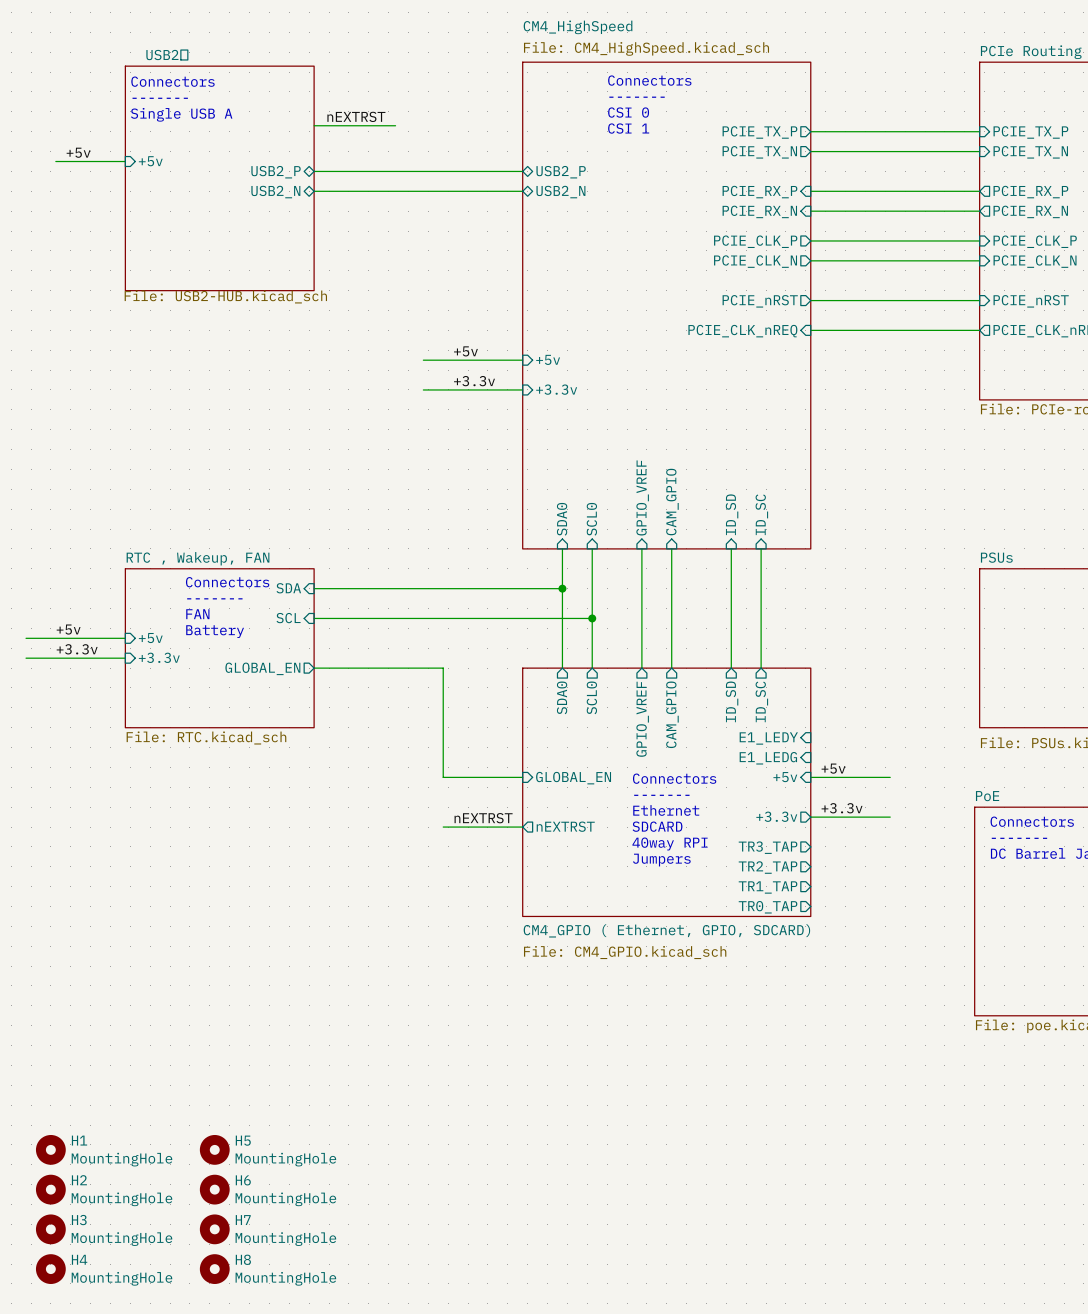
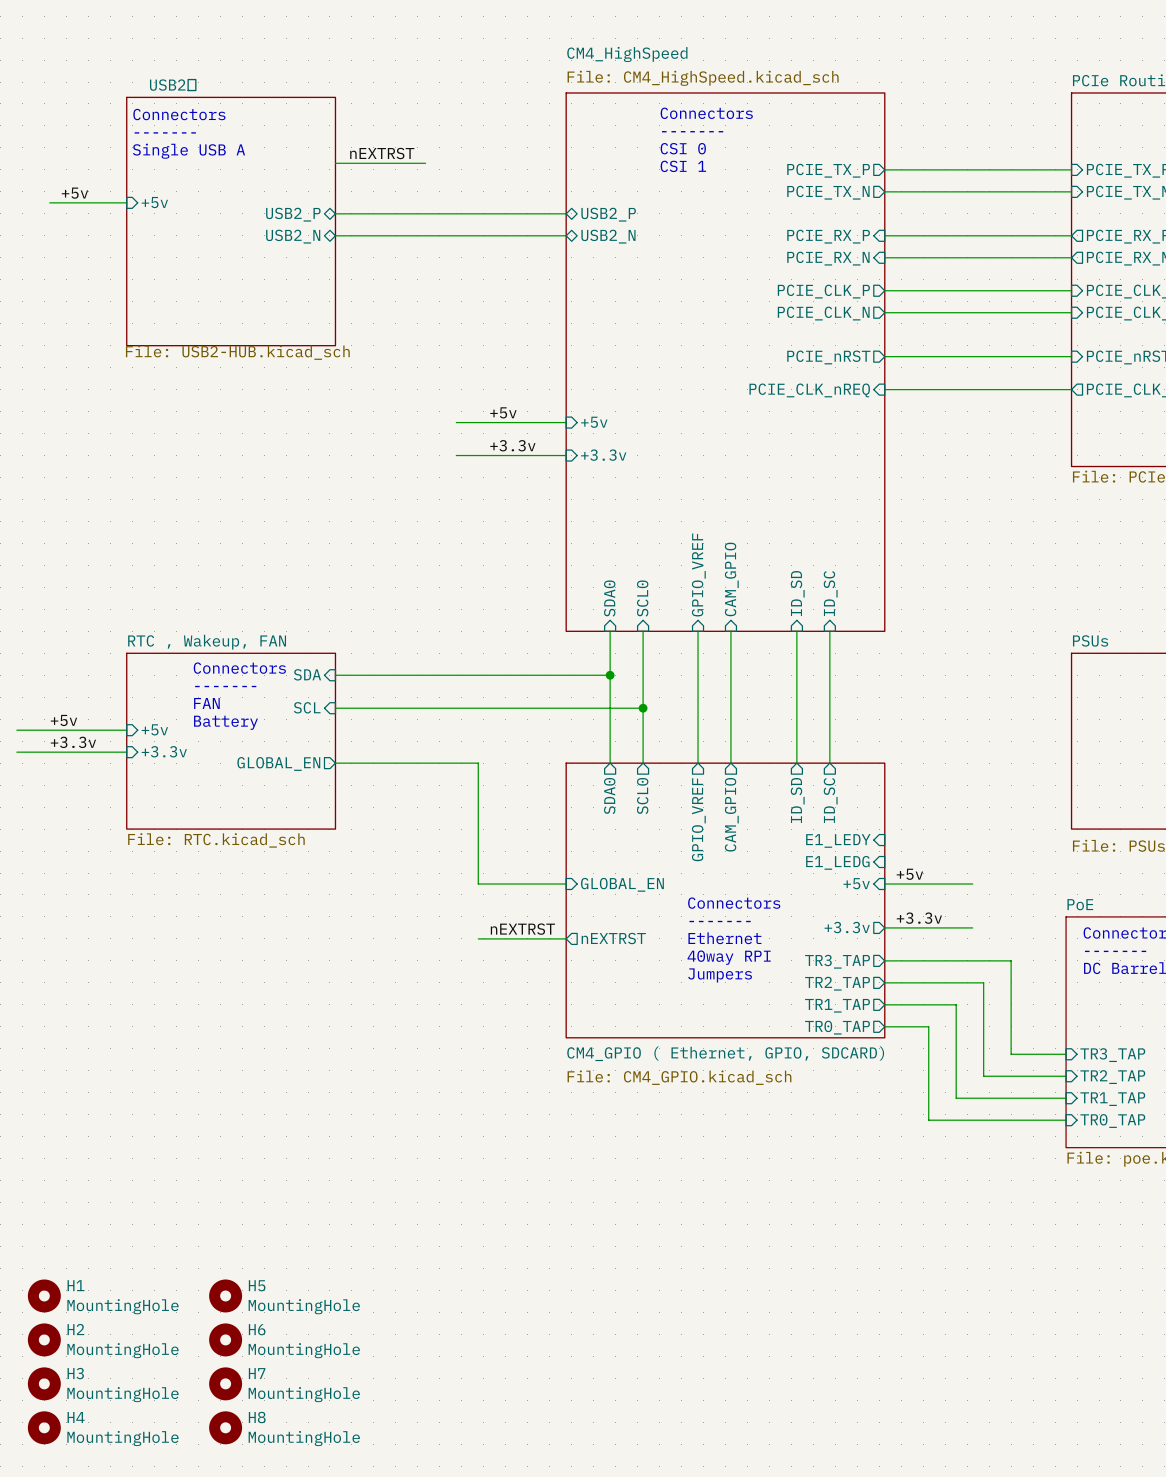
text: Connectors (674, 778) -> none
text: ------- (661, 795) -> Connectors (734, 903)
text: Ethernet (666, 810) -> ------- (720, 921)
text: SDCARD (657, 826) -> Ethernet (724, 938)
wire: none -> (884, 960) (1011, 960) (1011, 1054) (1066, 1054)
wire: none -> (884, 982) (983, 982) (983, 1076) (1066, 1076)
wire: none -> (884, 1004) (956, 1004) (956, 1098) (1066, 1098)
wire: none -> (884, 1026) (928, 1026) (928, 1120) (1066, 1120)
sheet pin: none -> TR3_TAP (1112, 1055)
sheet pin: none -> TR2_TAP (1112, 1077)
sheet pin: none -> TR1_TAP (1112, 1099)
sheet pin: none -> TR0_TAP (1112, 1121)

